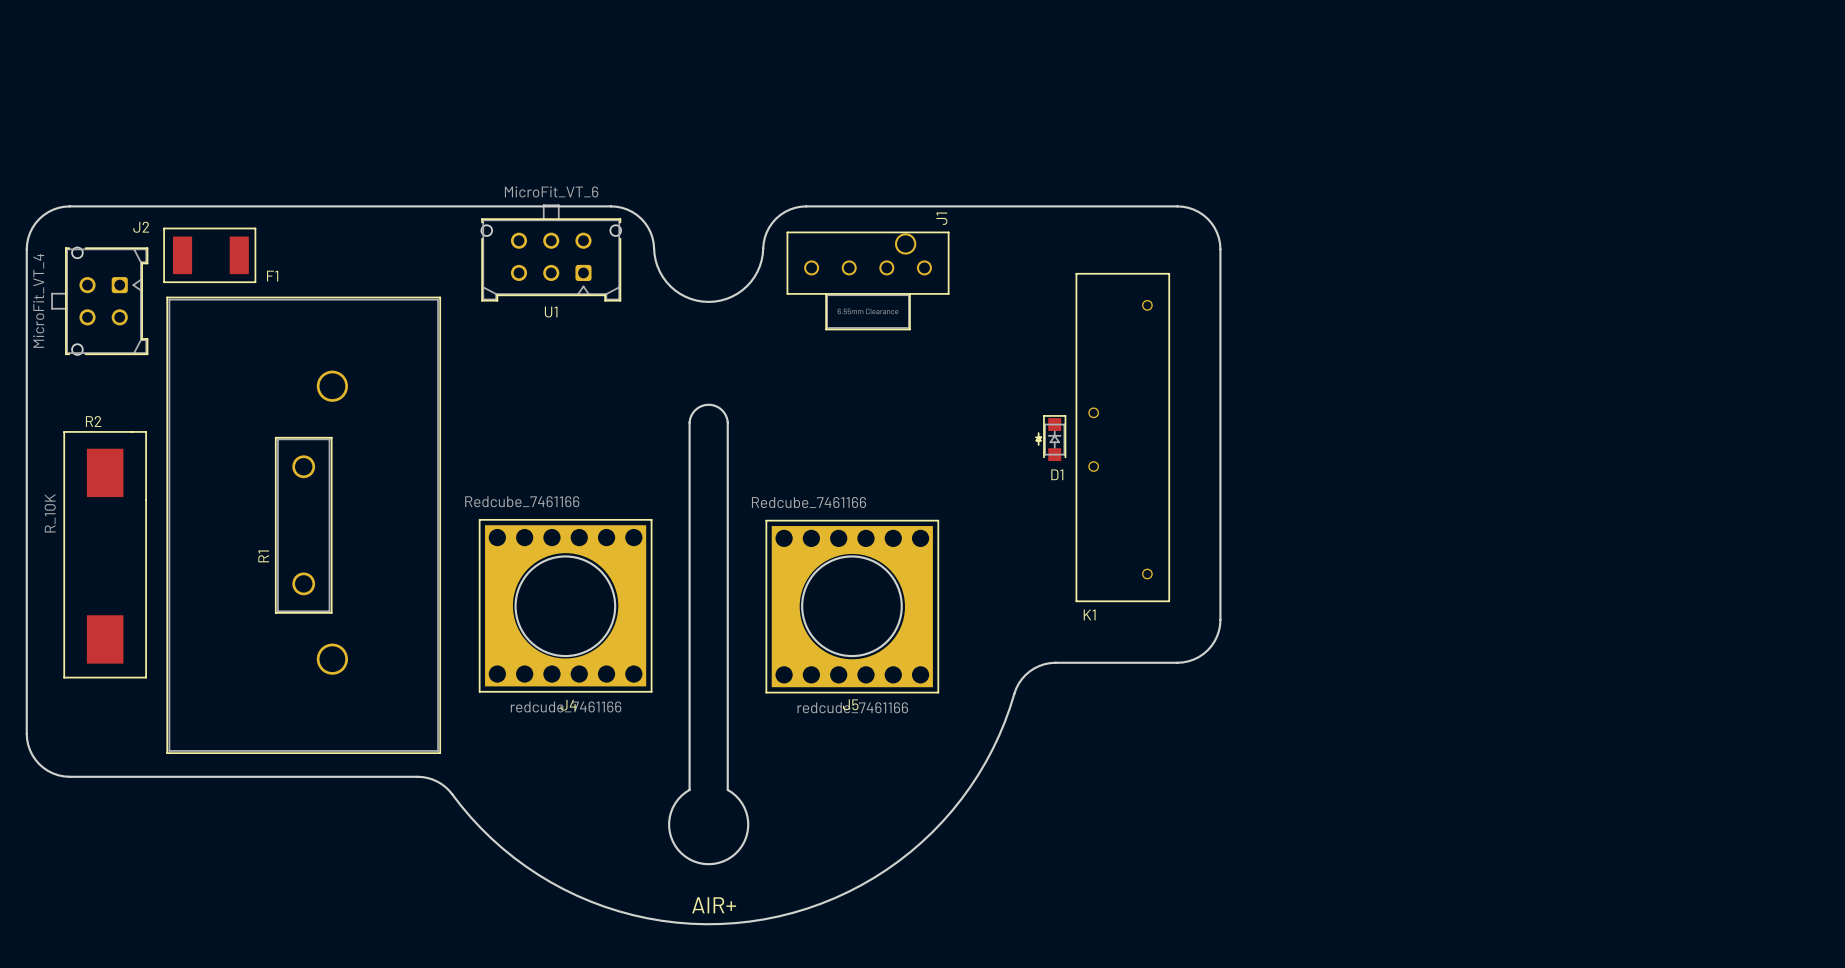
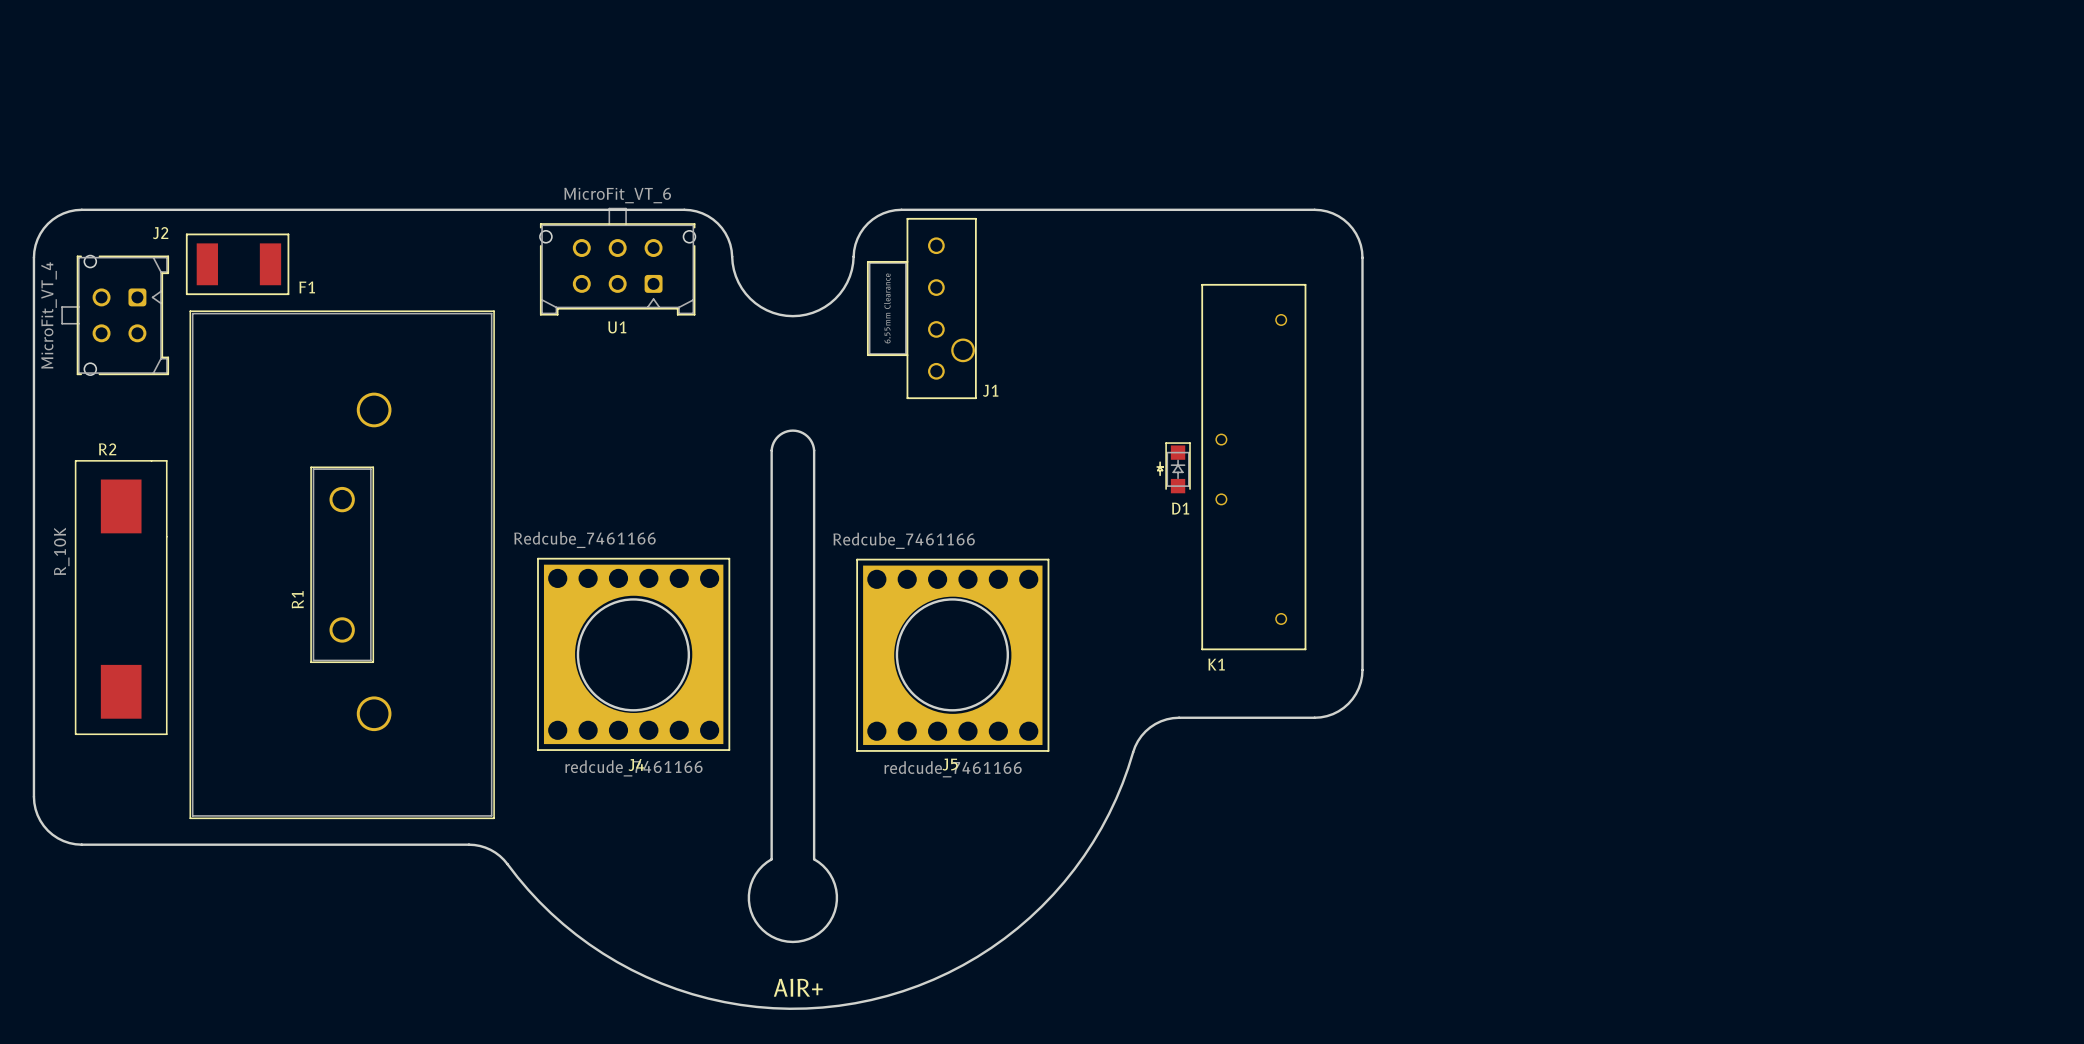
J1 rotation: 0° (868, 280) -> 90° clockwise (921, 308)

